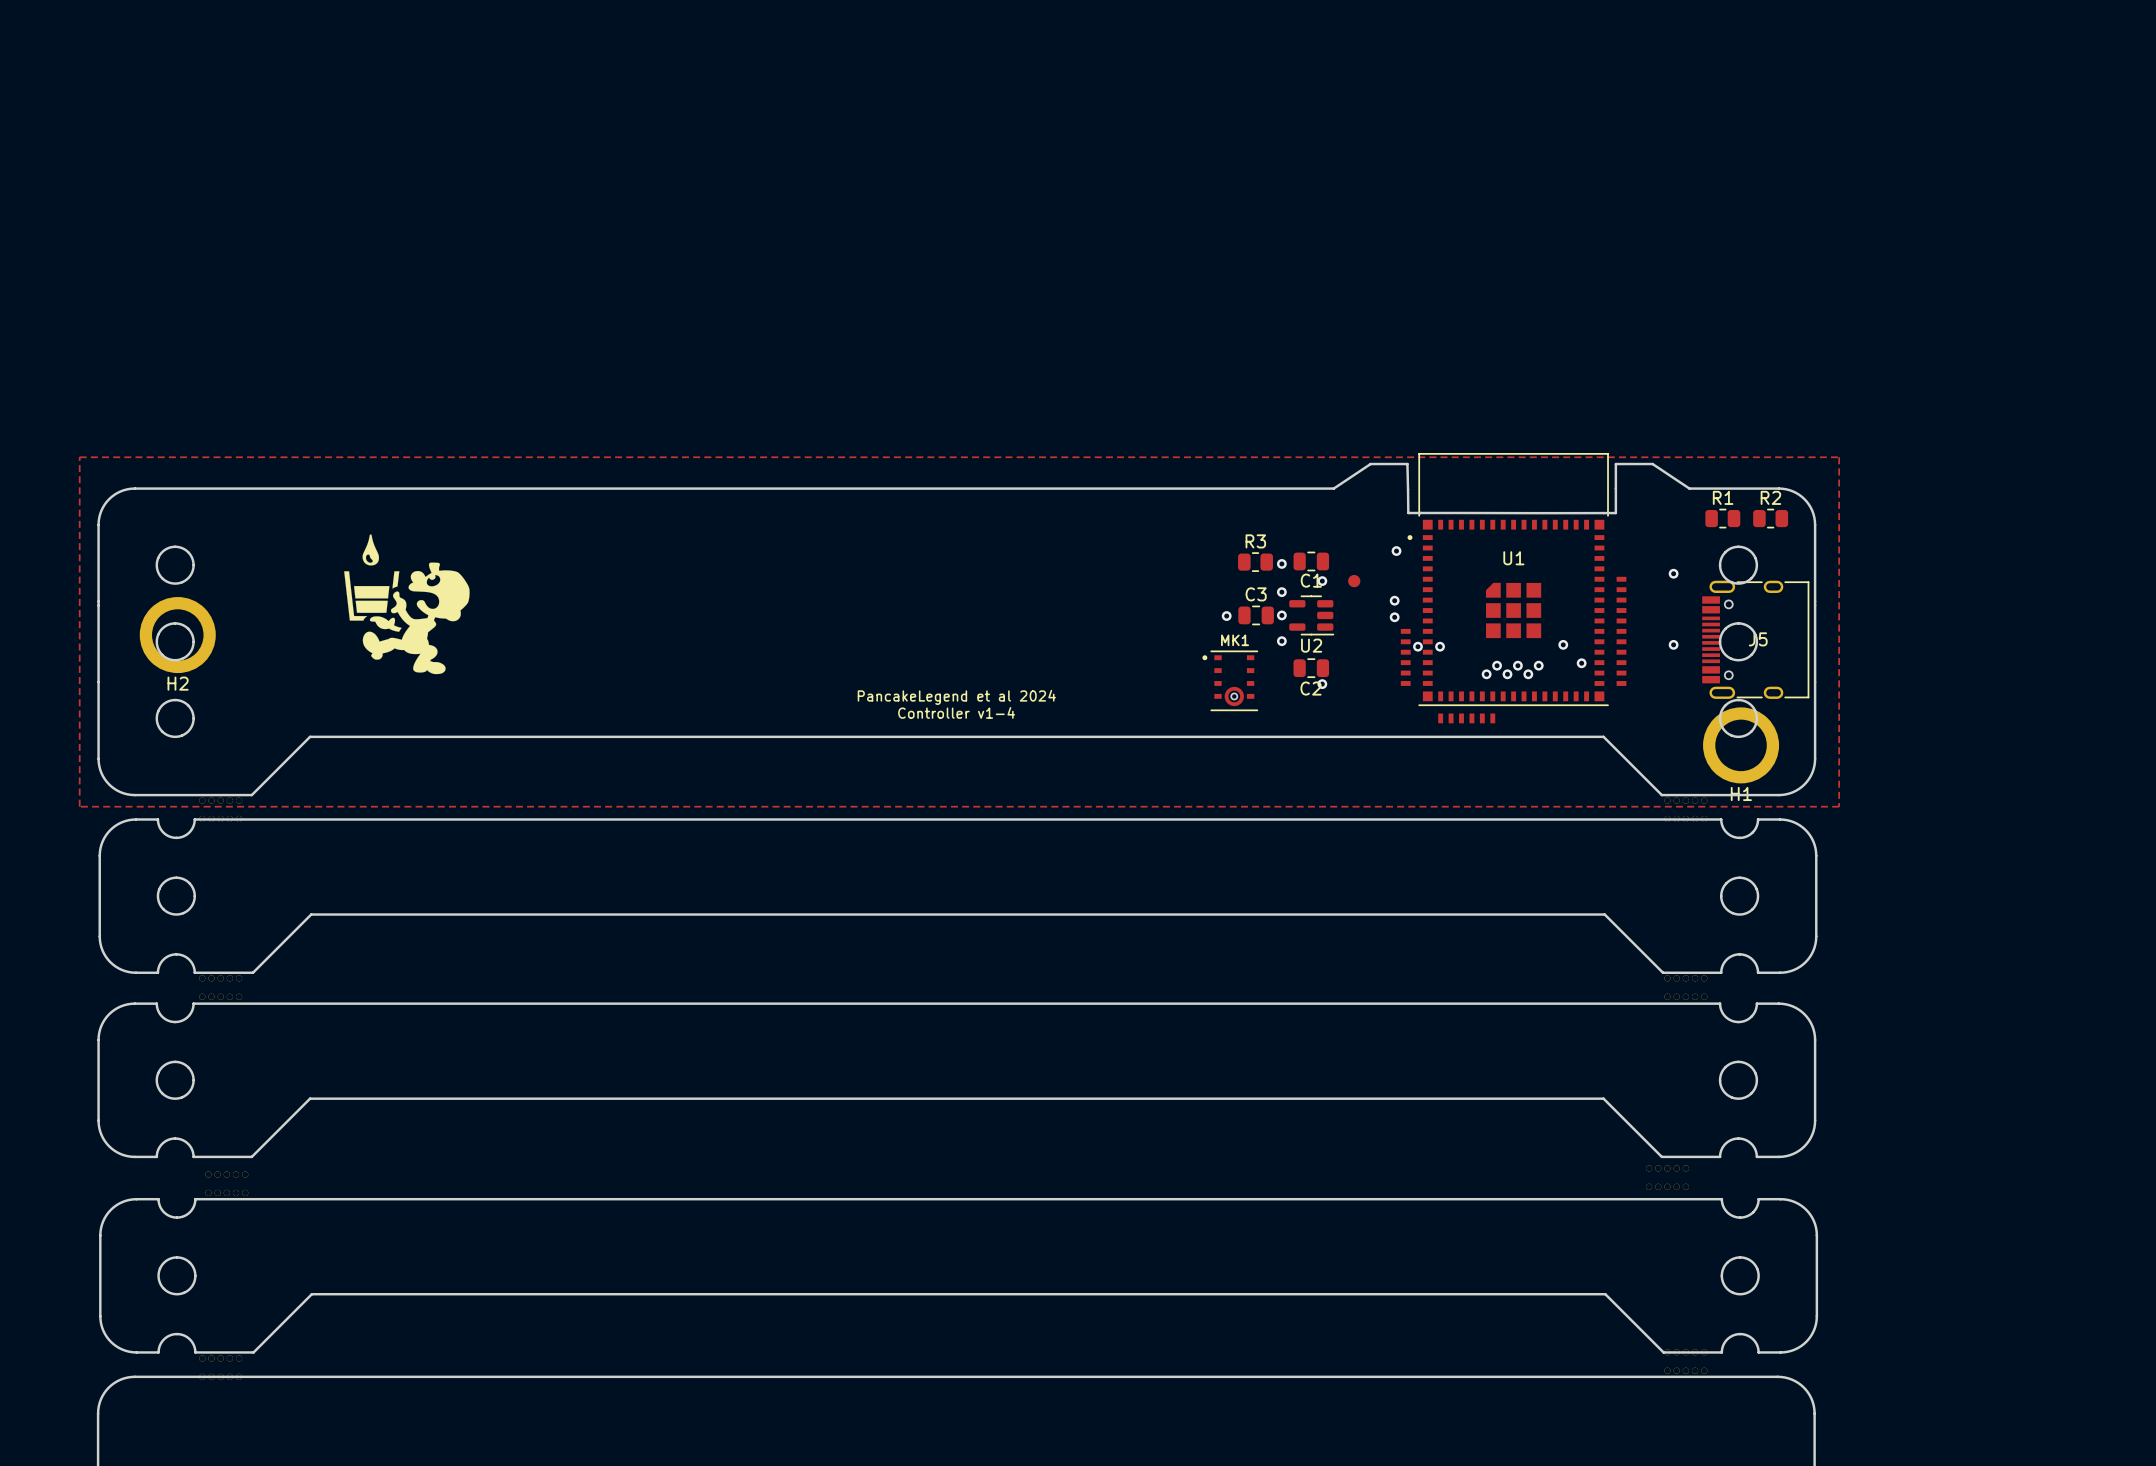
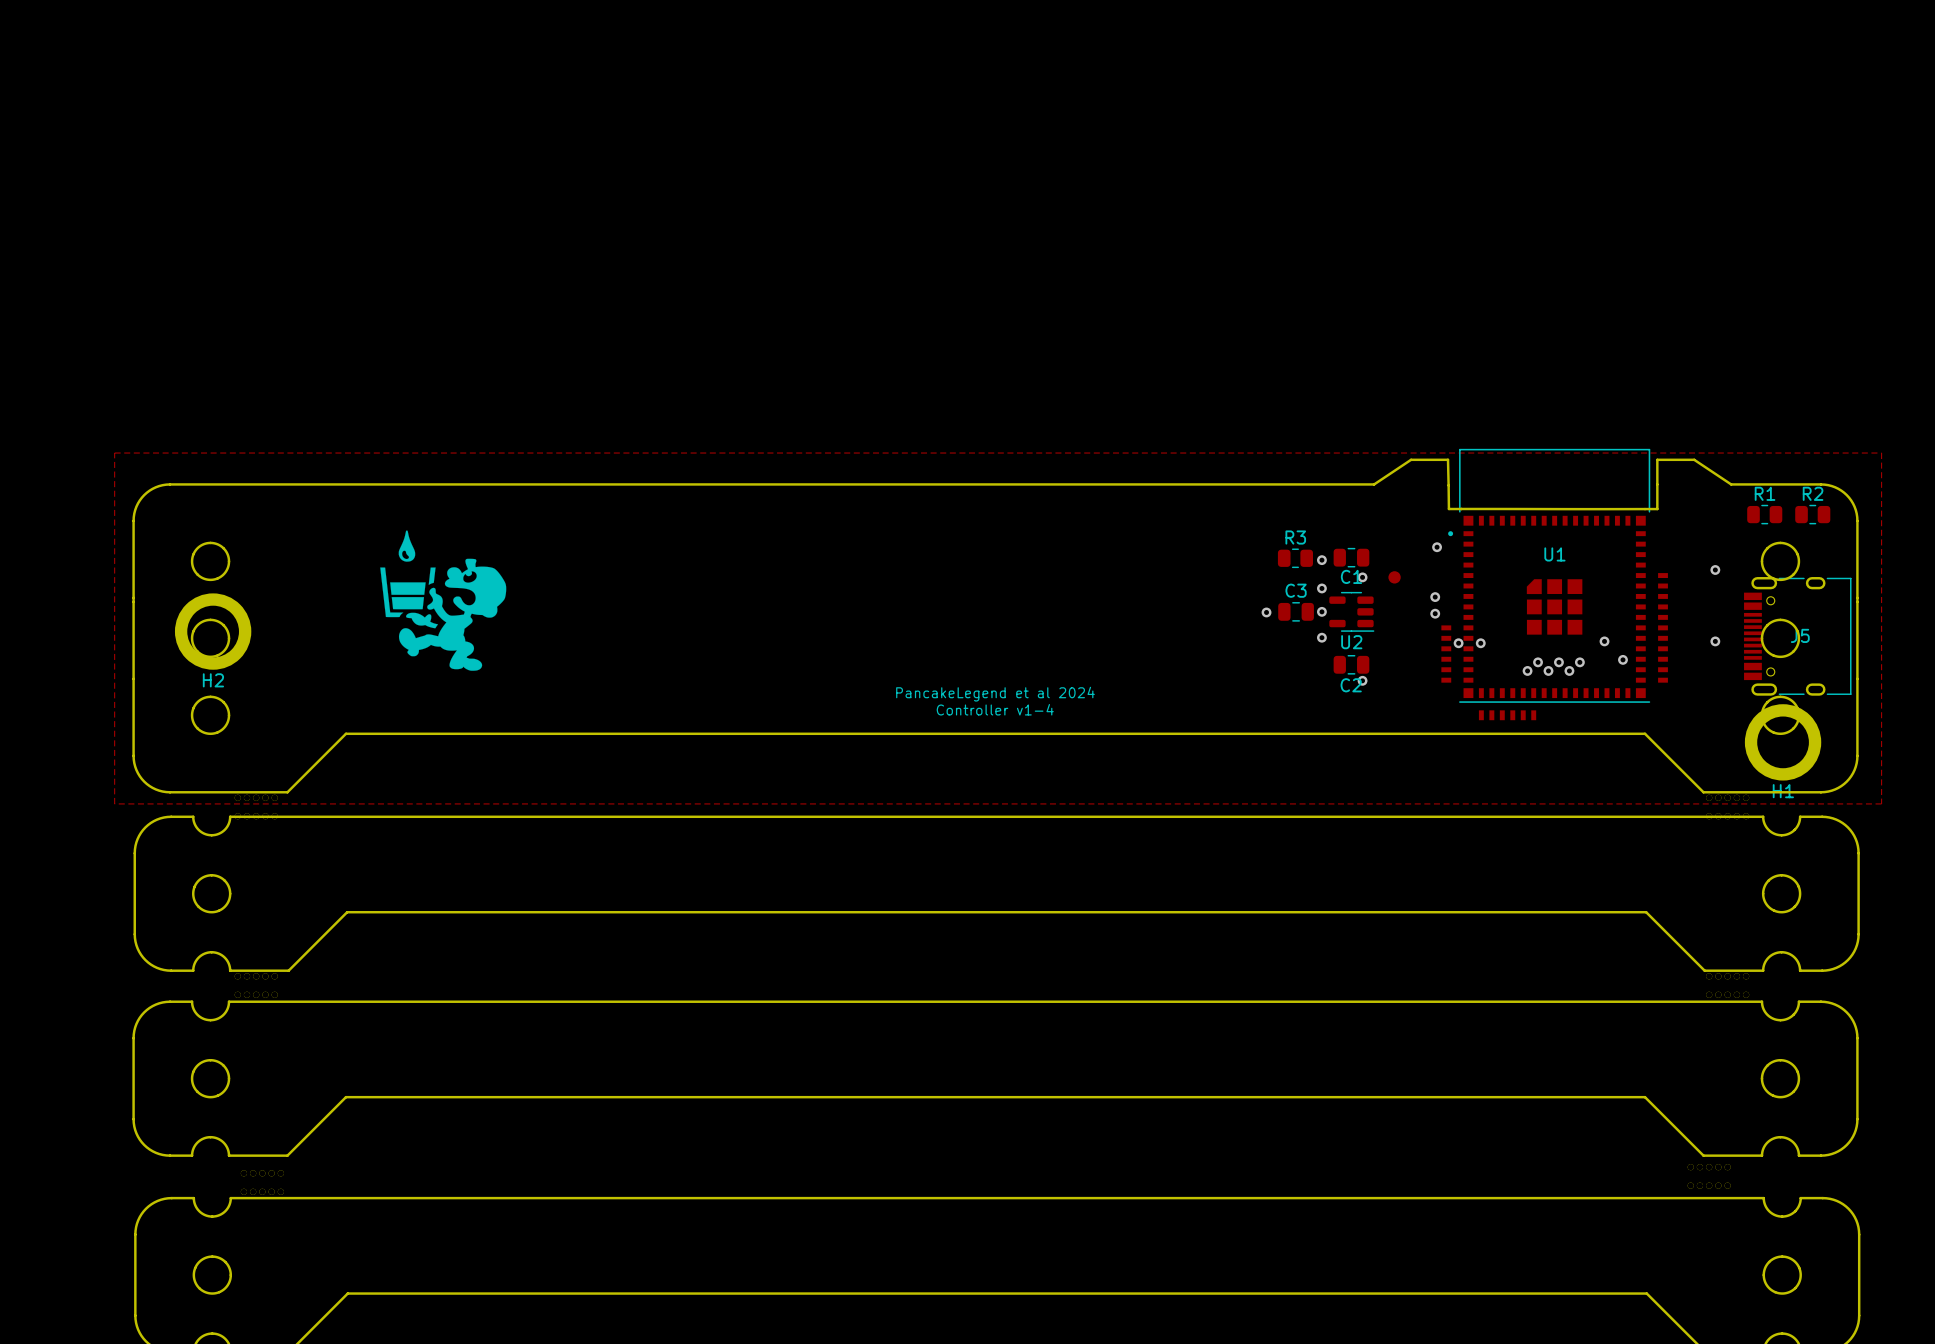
MK1: (1230, 680) -> none

